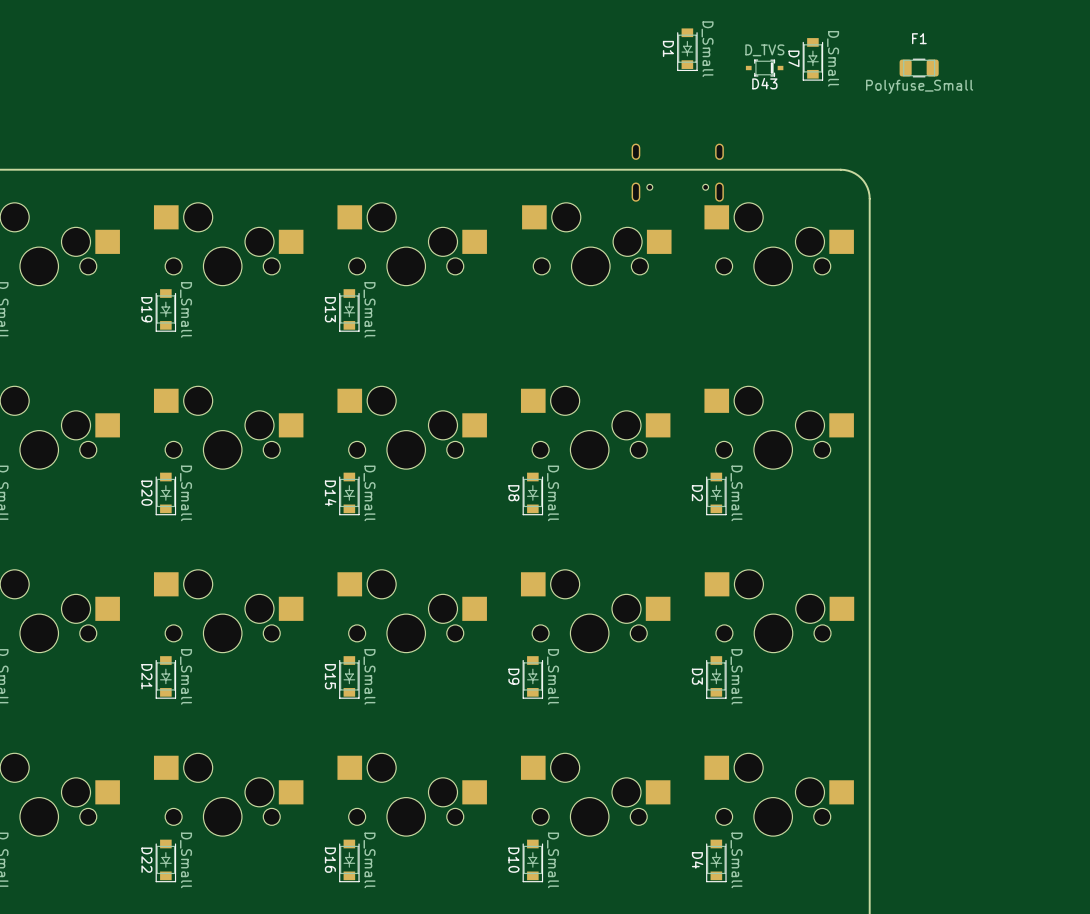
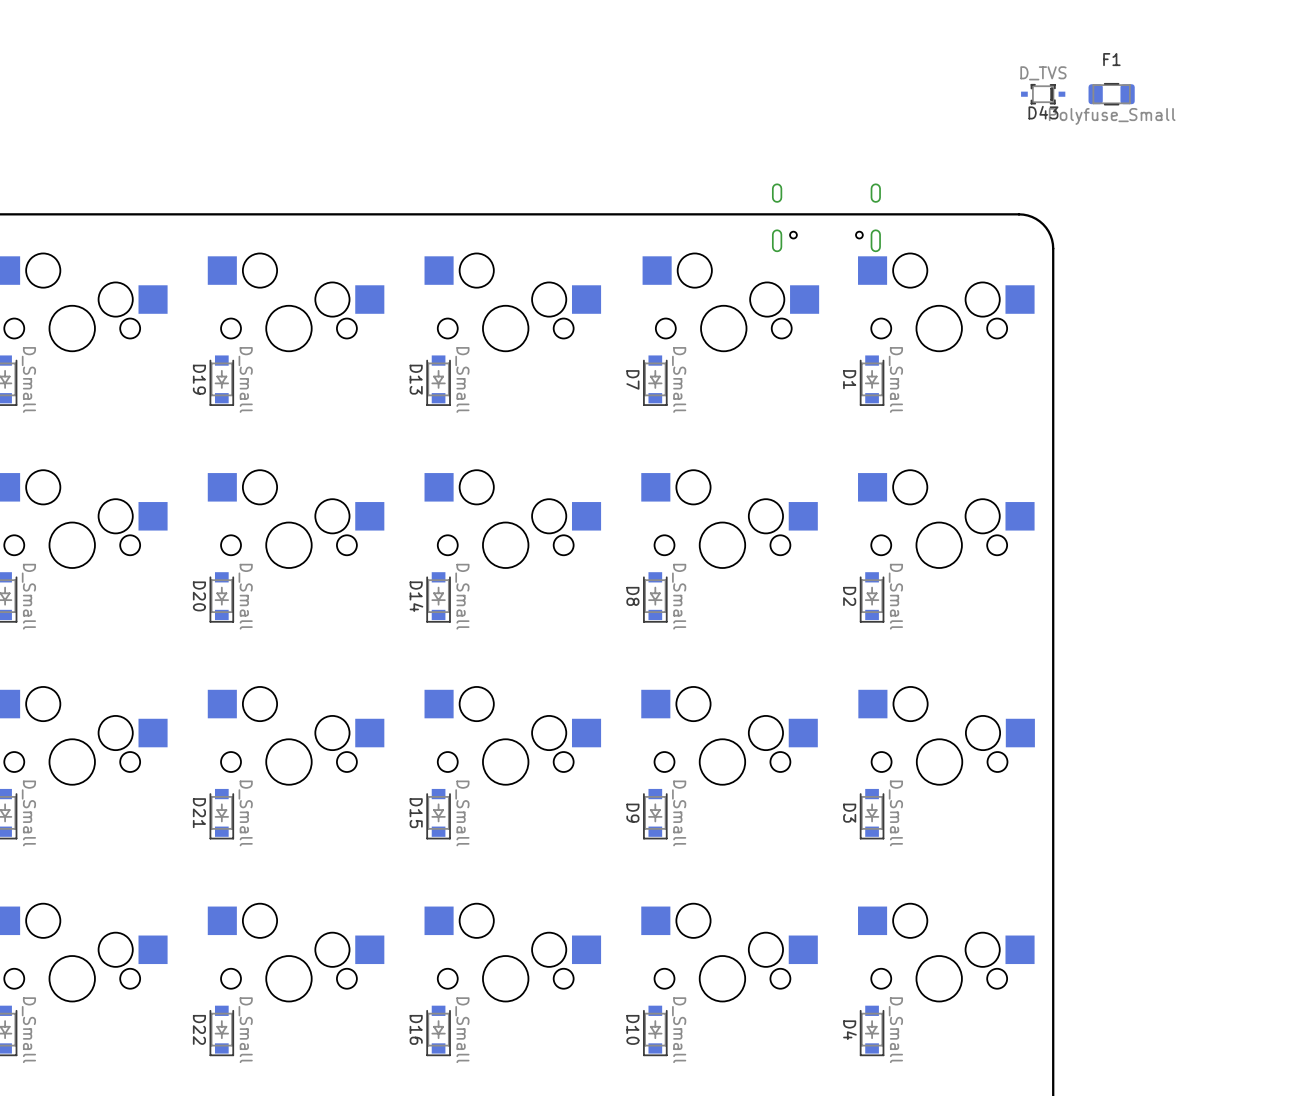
D1 position: (687, 49) -> (872, 380)
D7 position: (812, 59) -> (655, 380)
D43 position: (764, 68) -> (1043, 94)

